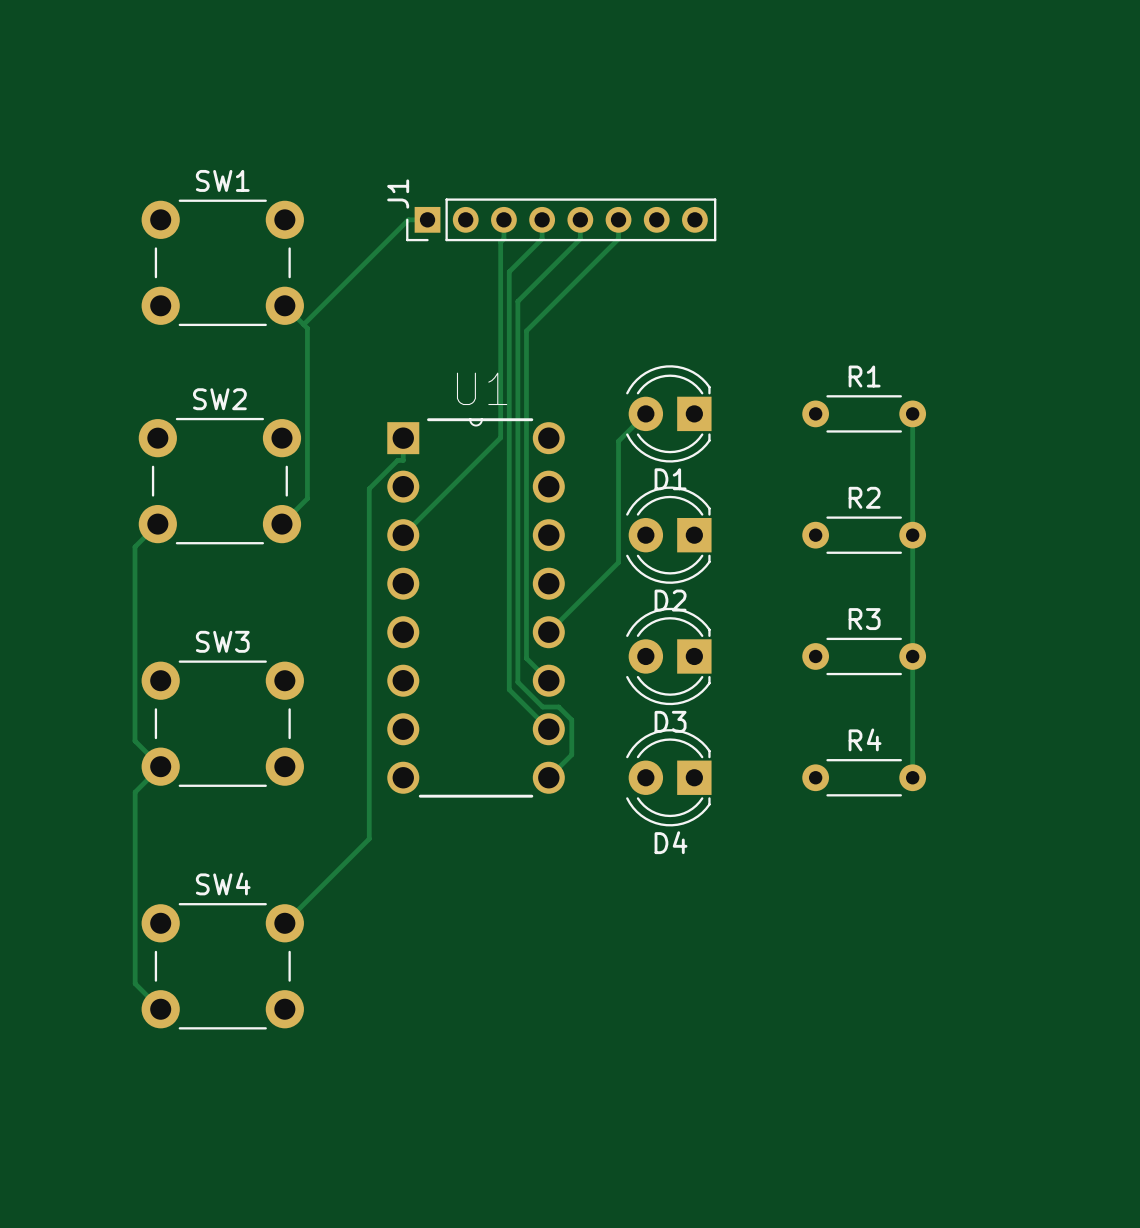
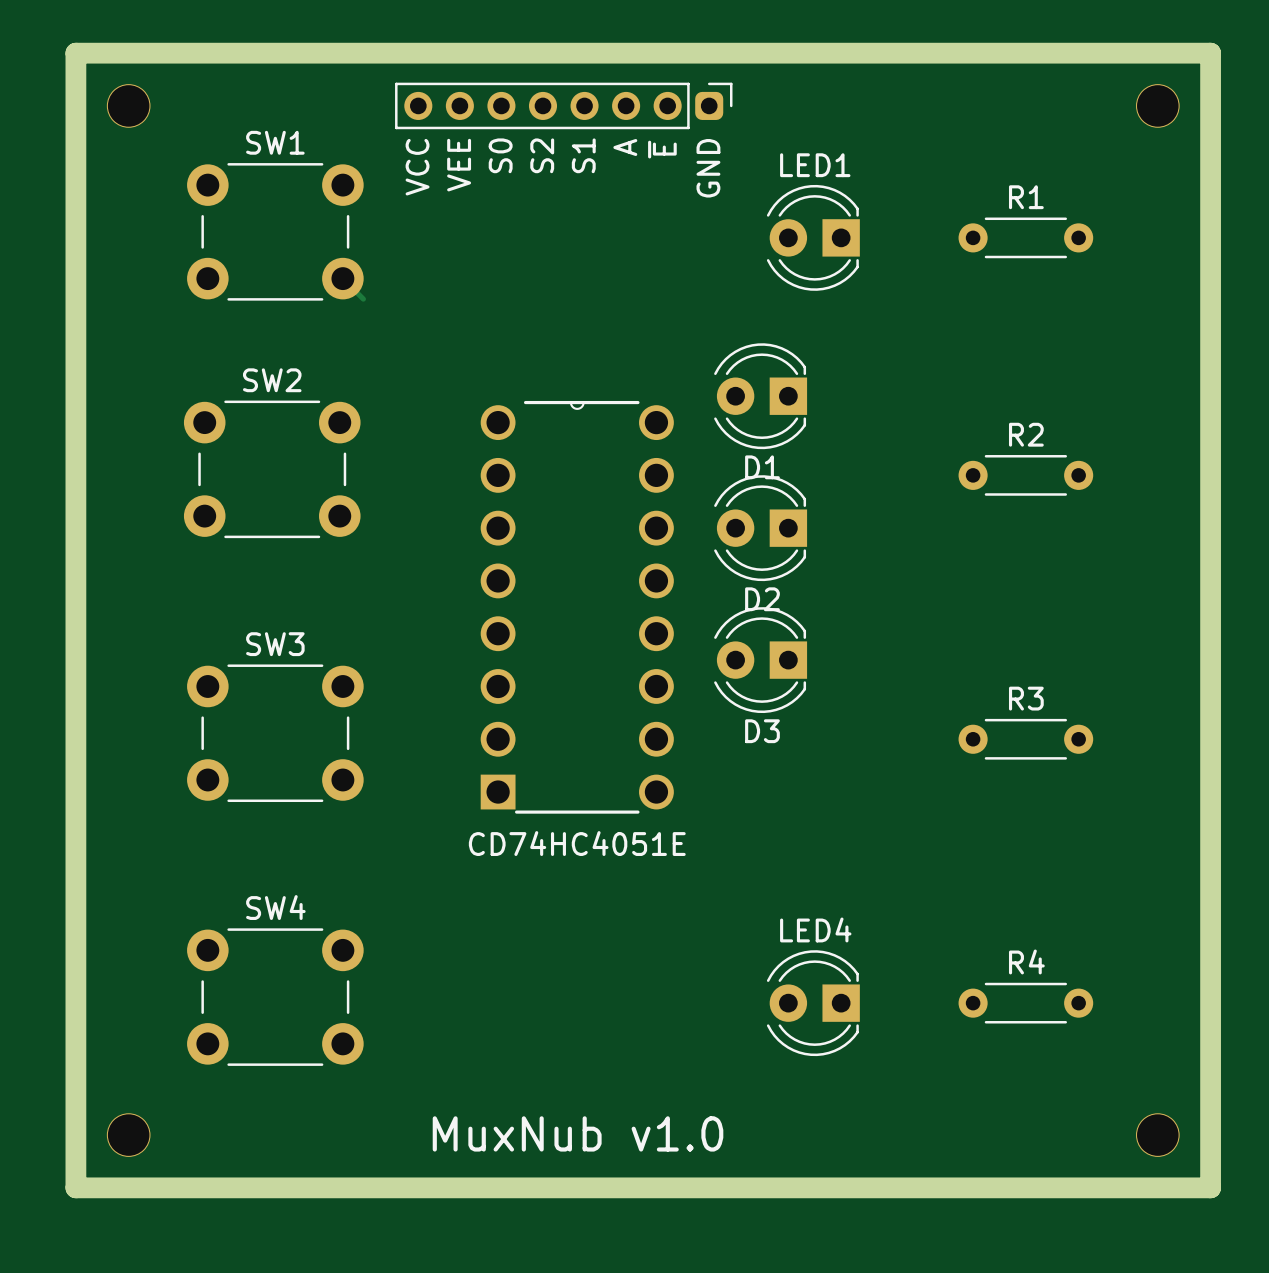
board edge: none -> (75, 53) (75, 1187) (1210, 1187) (1210, 53) (75, 53)
part: none -> (128, 105)
part: none -> (563, 105)
part: none -> (1157, 105)
track: (427, 219) (408, 219) (303, 324) (307, 328) (307, 498) (281, 524) -> none
track: (503, 219) (503, 238) (500, 242) (500, 437) (403, 535) -> none
track: (542, 219) (542, 238) (509, 271) (509, 689) (548, 729) -> none
J1: (561, 219) -> none
track: (580, 219) (580, 238) (517, 301) (517, 682) (542, 707) (558, 707) (571, 720) (571, 754) (548, 777) -> none
track: (618, 219) (618, 238) (526, 331) (526, 658) (548, 680) -> none
part: none -> LED1 (813, 237)
track: (645, 413) (618, 441) (618, 562) (548, 632) -> none
R1 position: (864, 413) -> (1025, 237)
track: (912, 413) (912, 777) -> none
track: (403, 438) (403, 460) (397, 460) (369, 488) (369, 838) (284, 923) -> none
track: (157, 524) (134, 546) (134, 740) (160, 766) (135, 792) (135, 983) (160, 1009) -> none
R2 position: (864, 535) -> (1025, 475)
U1: (476, 607) -> none
part: none -> CD74HC4051E (577, 607)
R3 position: (864, 656) -> (1025, 739)
D4: (668, 777) -> none
R4 position: (864, 777) -> (1025, 1003)
part: none -> LED4 (813, 1003)
text: none -> MuxNub v1.0 (578, 1133)
part: none -> (128, 1135)
part: none -> (1157, 1135)

